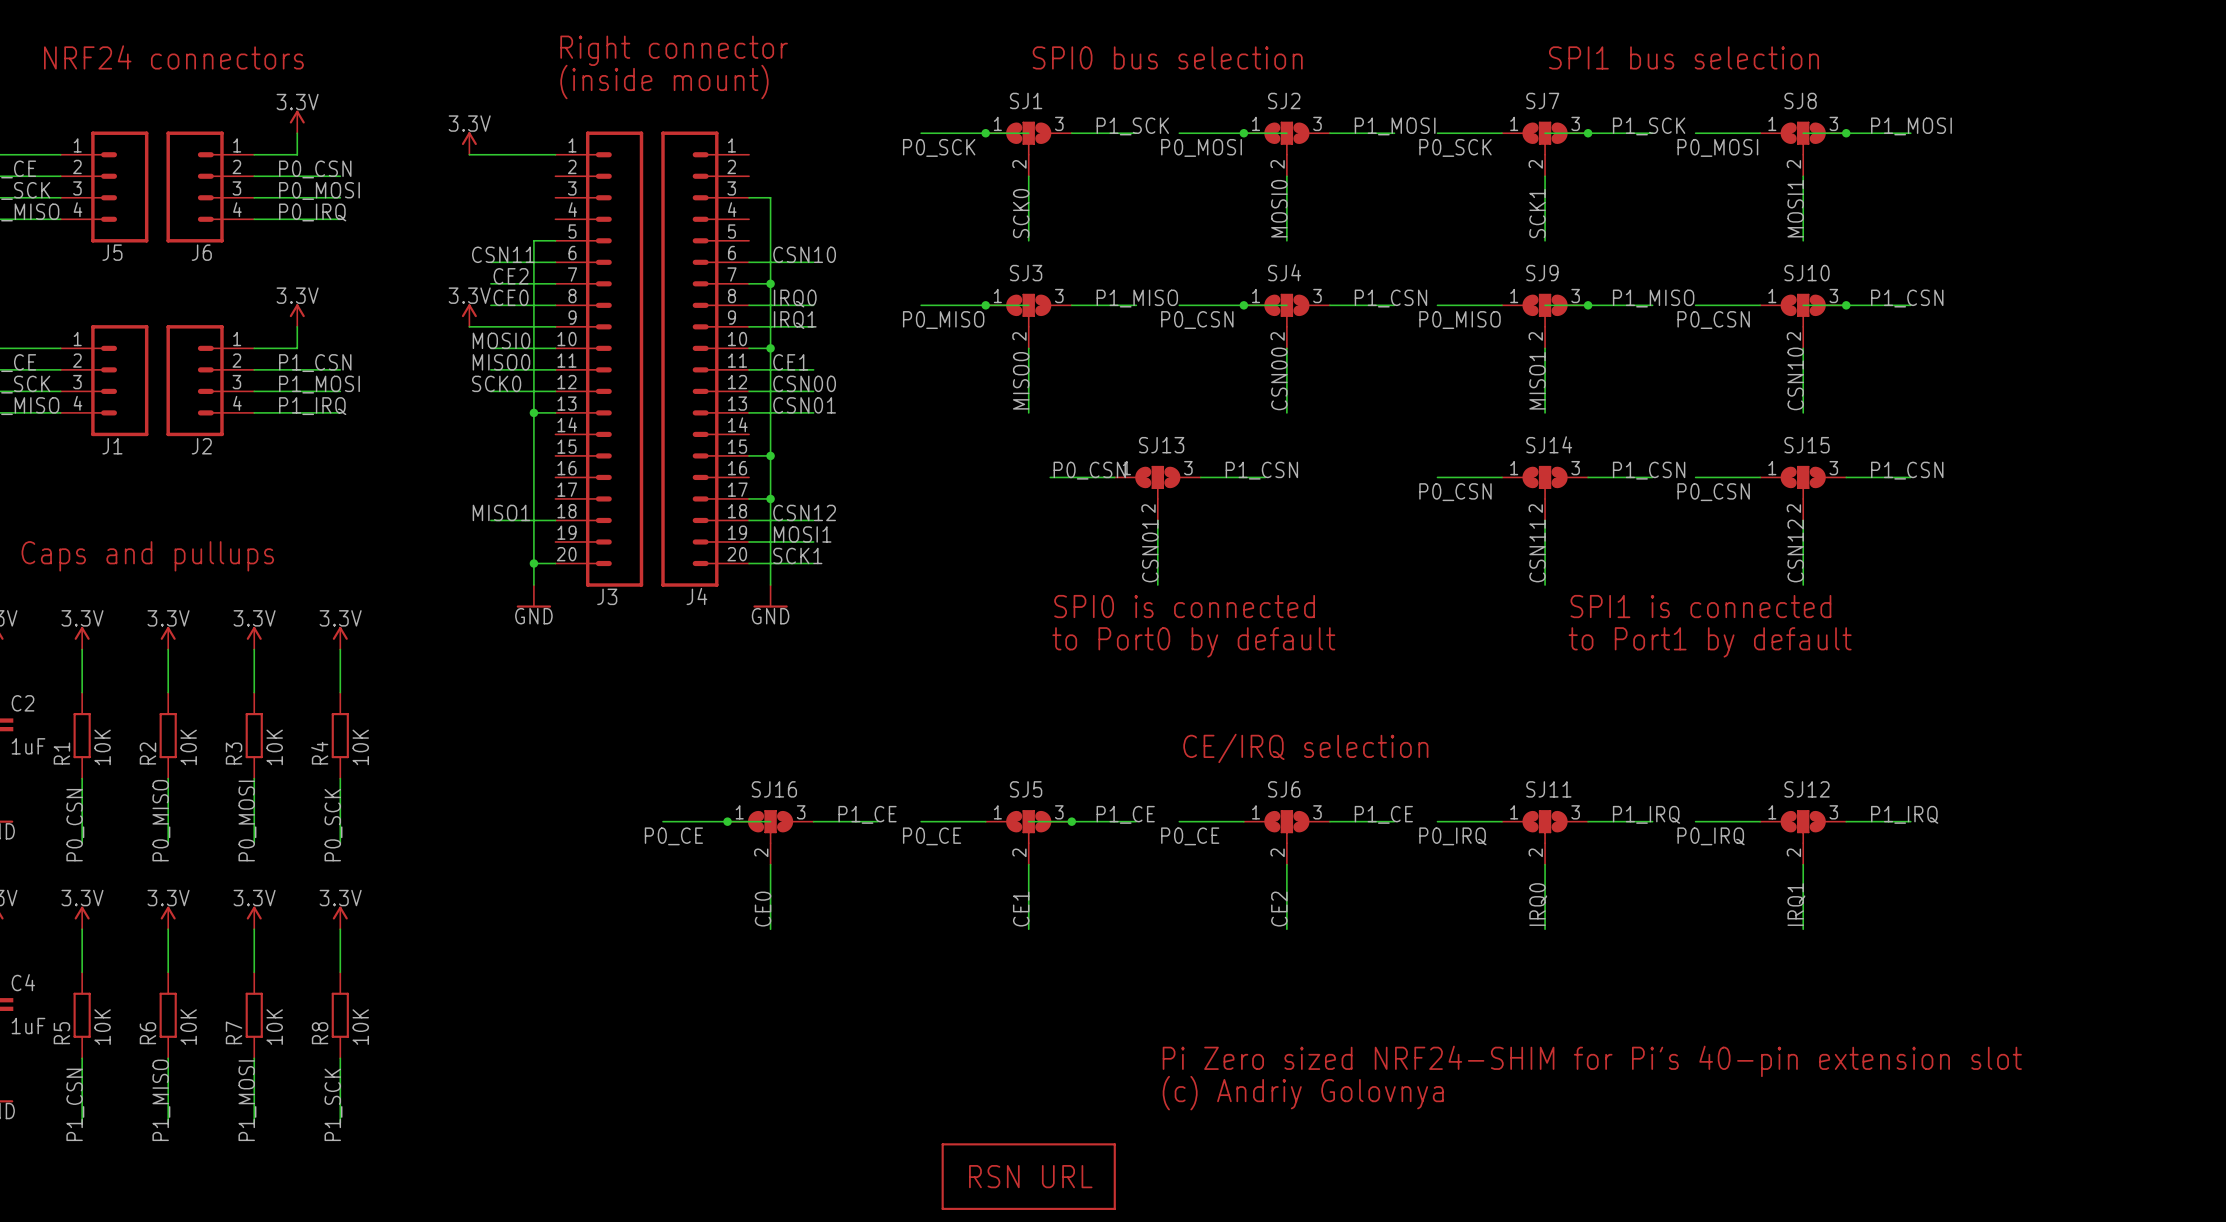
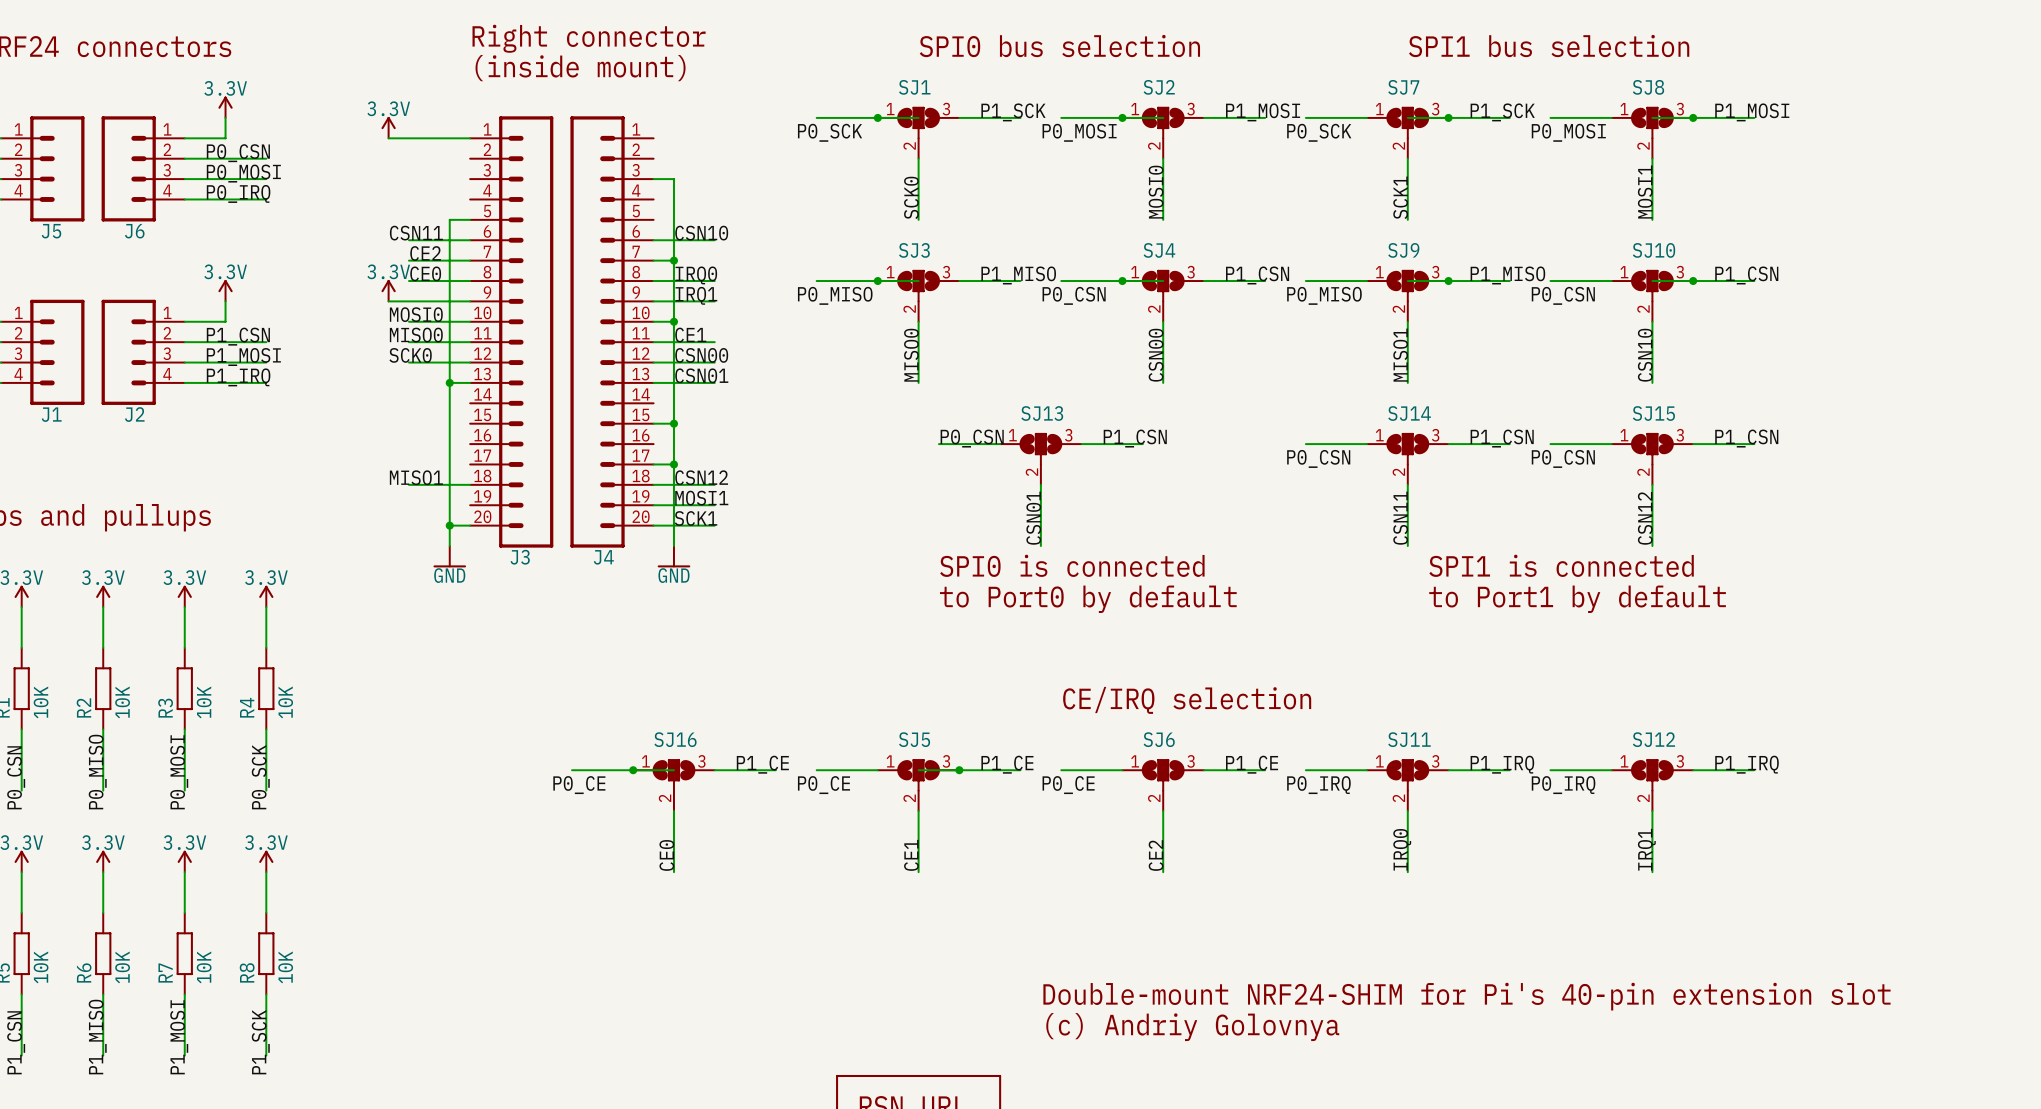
text: Pi Zero sized NRF24-SHIM for Pi's 40-pin extension slot (1592, 1061) -> Double-mount NRF24-SHIM for Pi's 40-pin extension slot (1466, 996)

